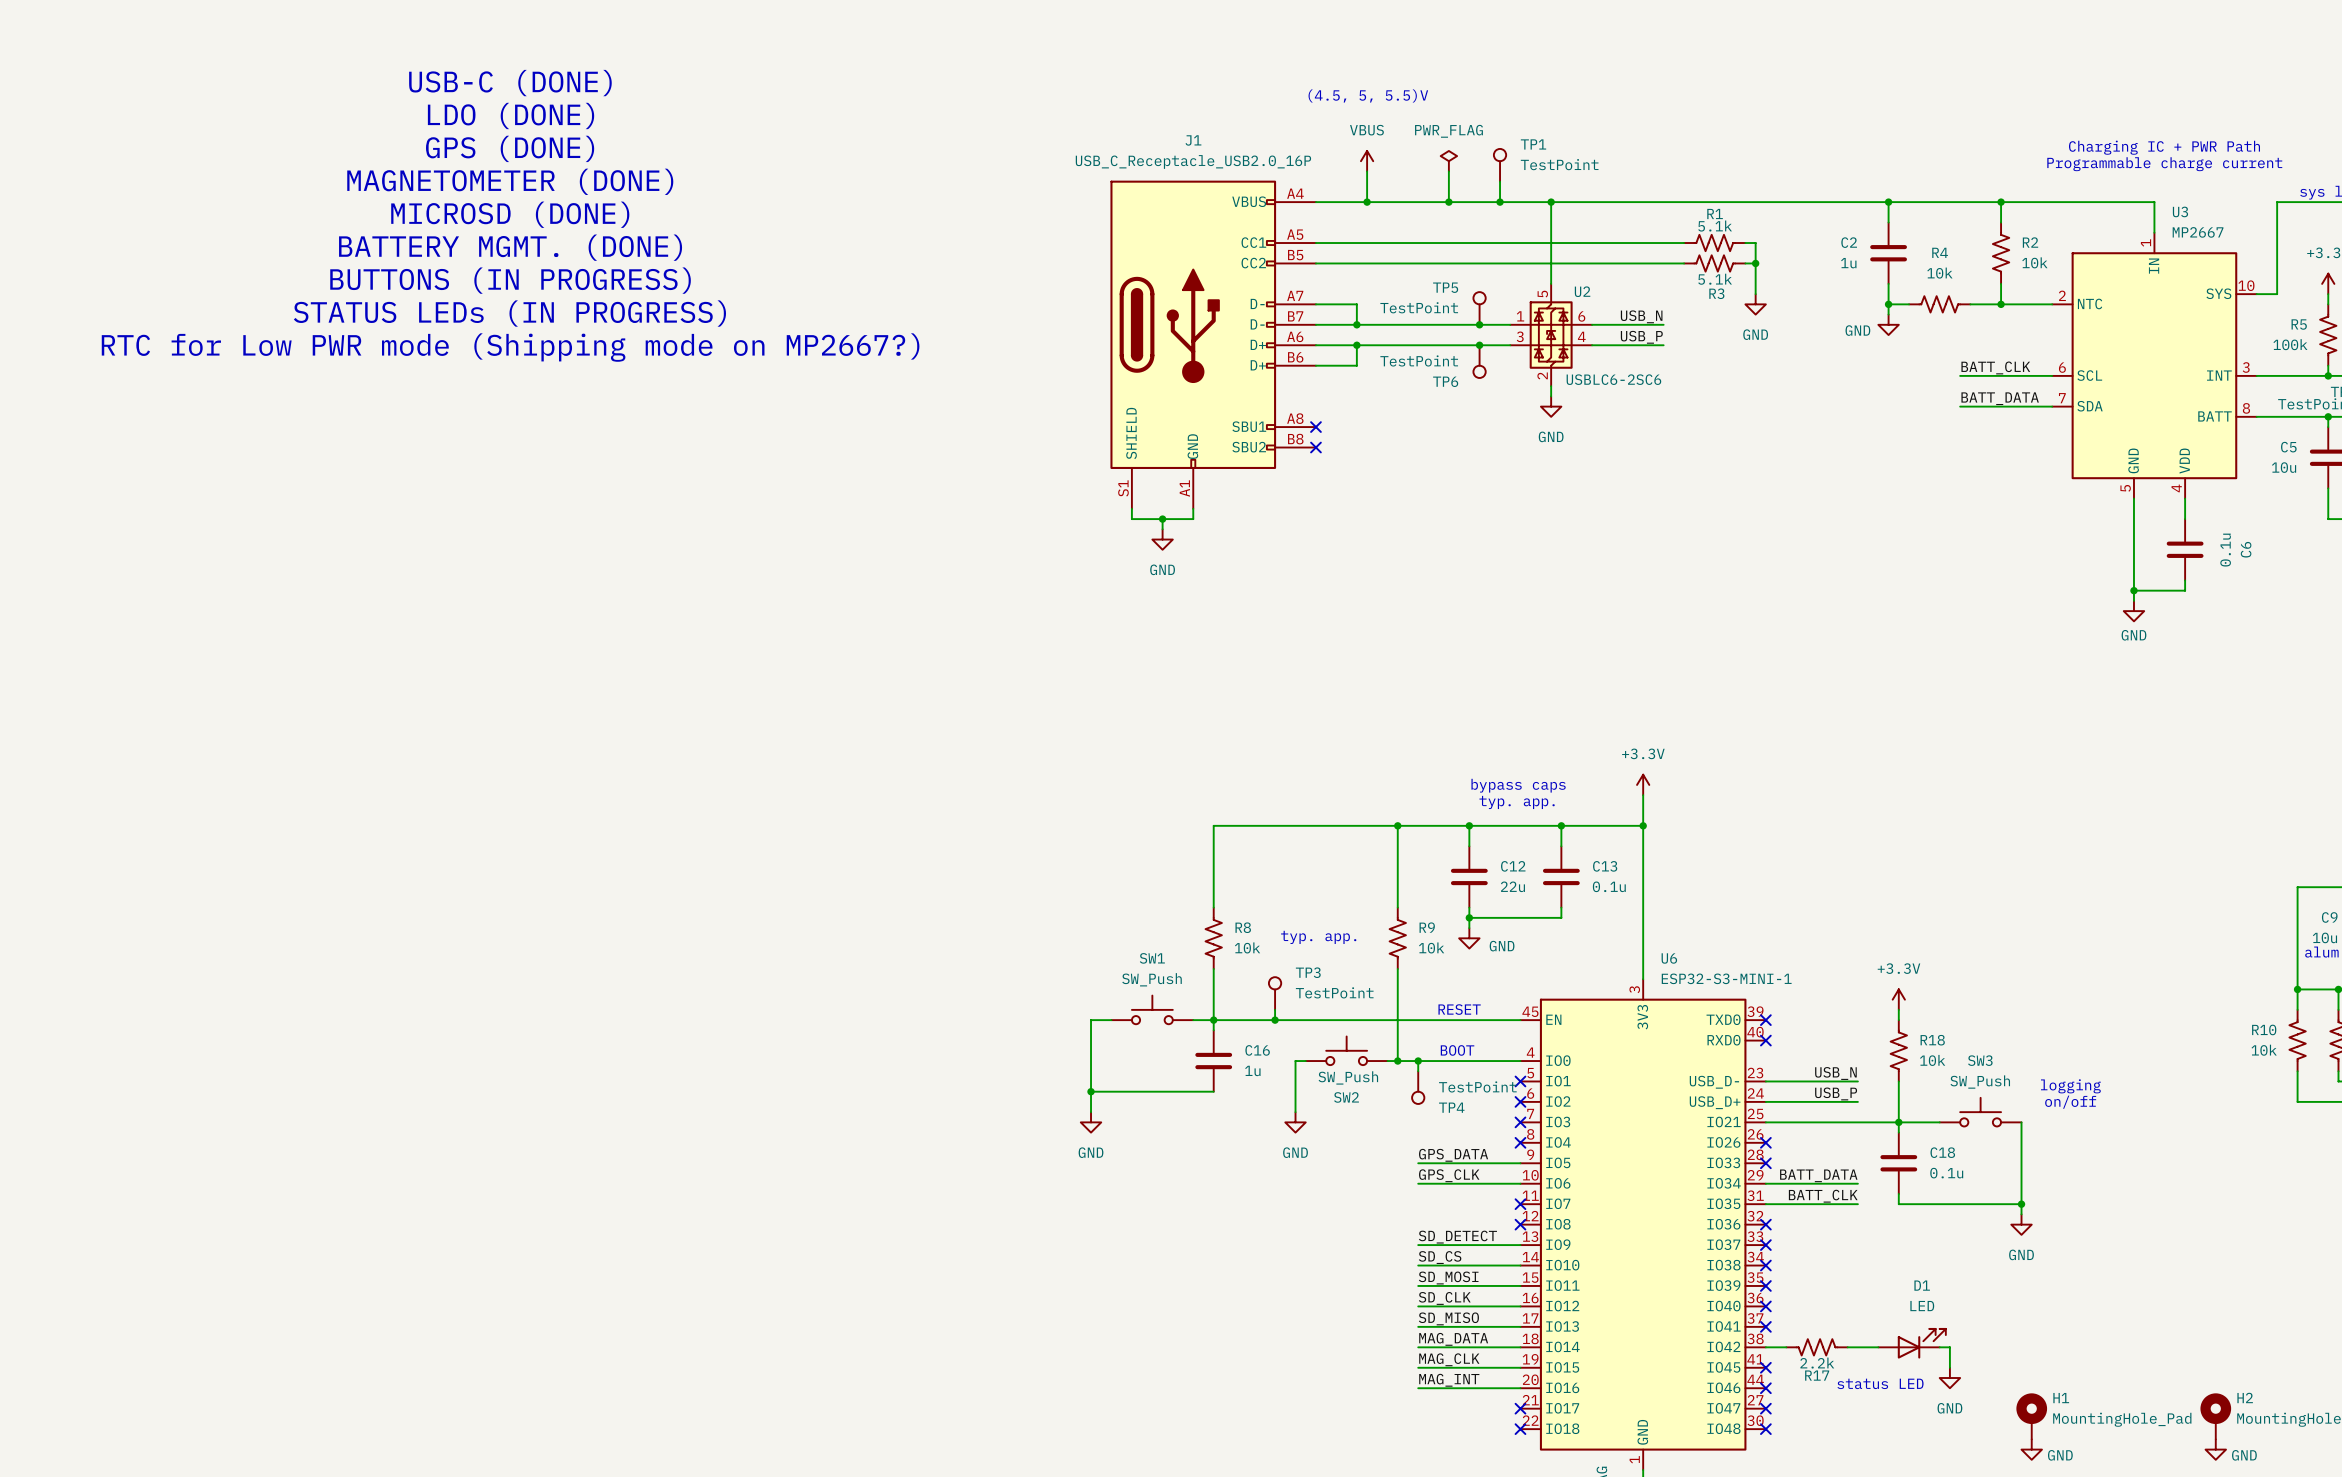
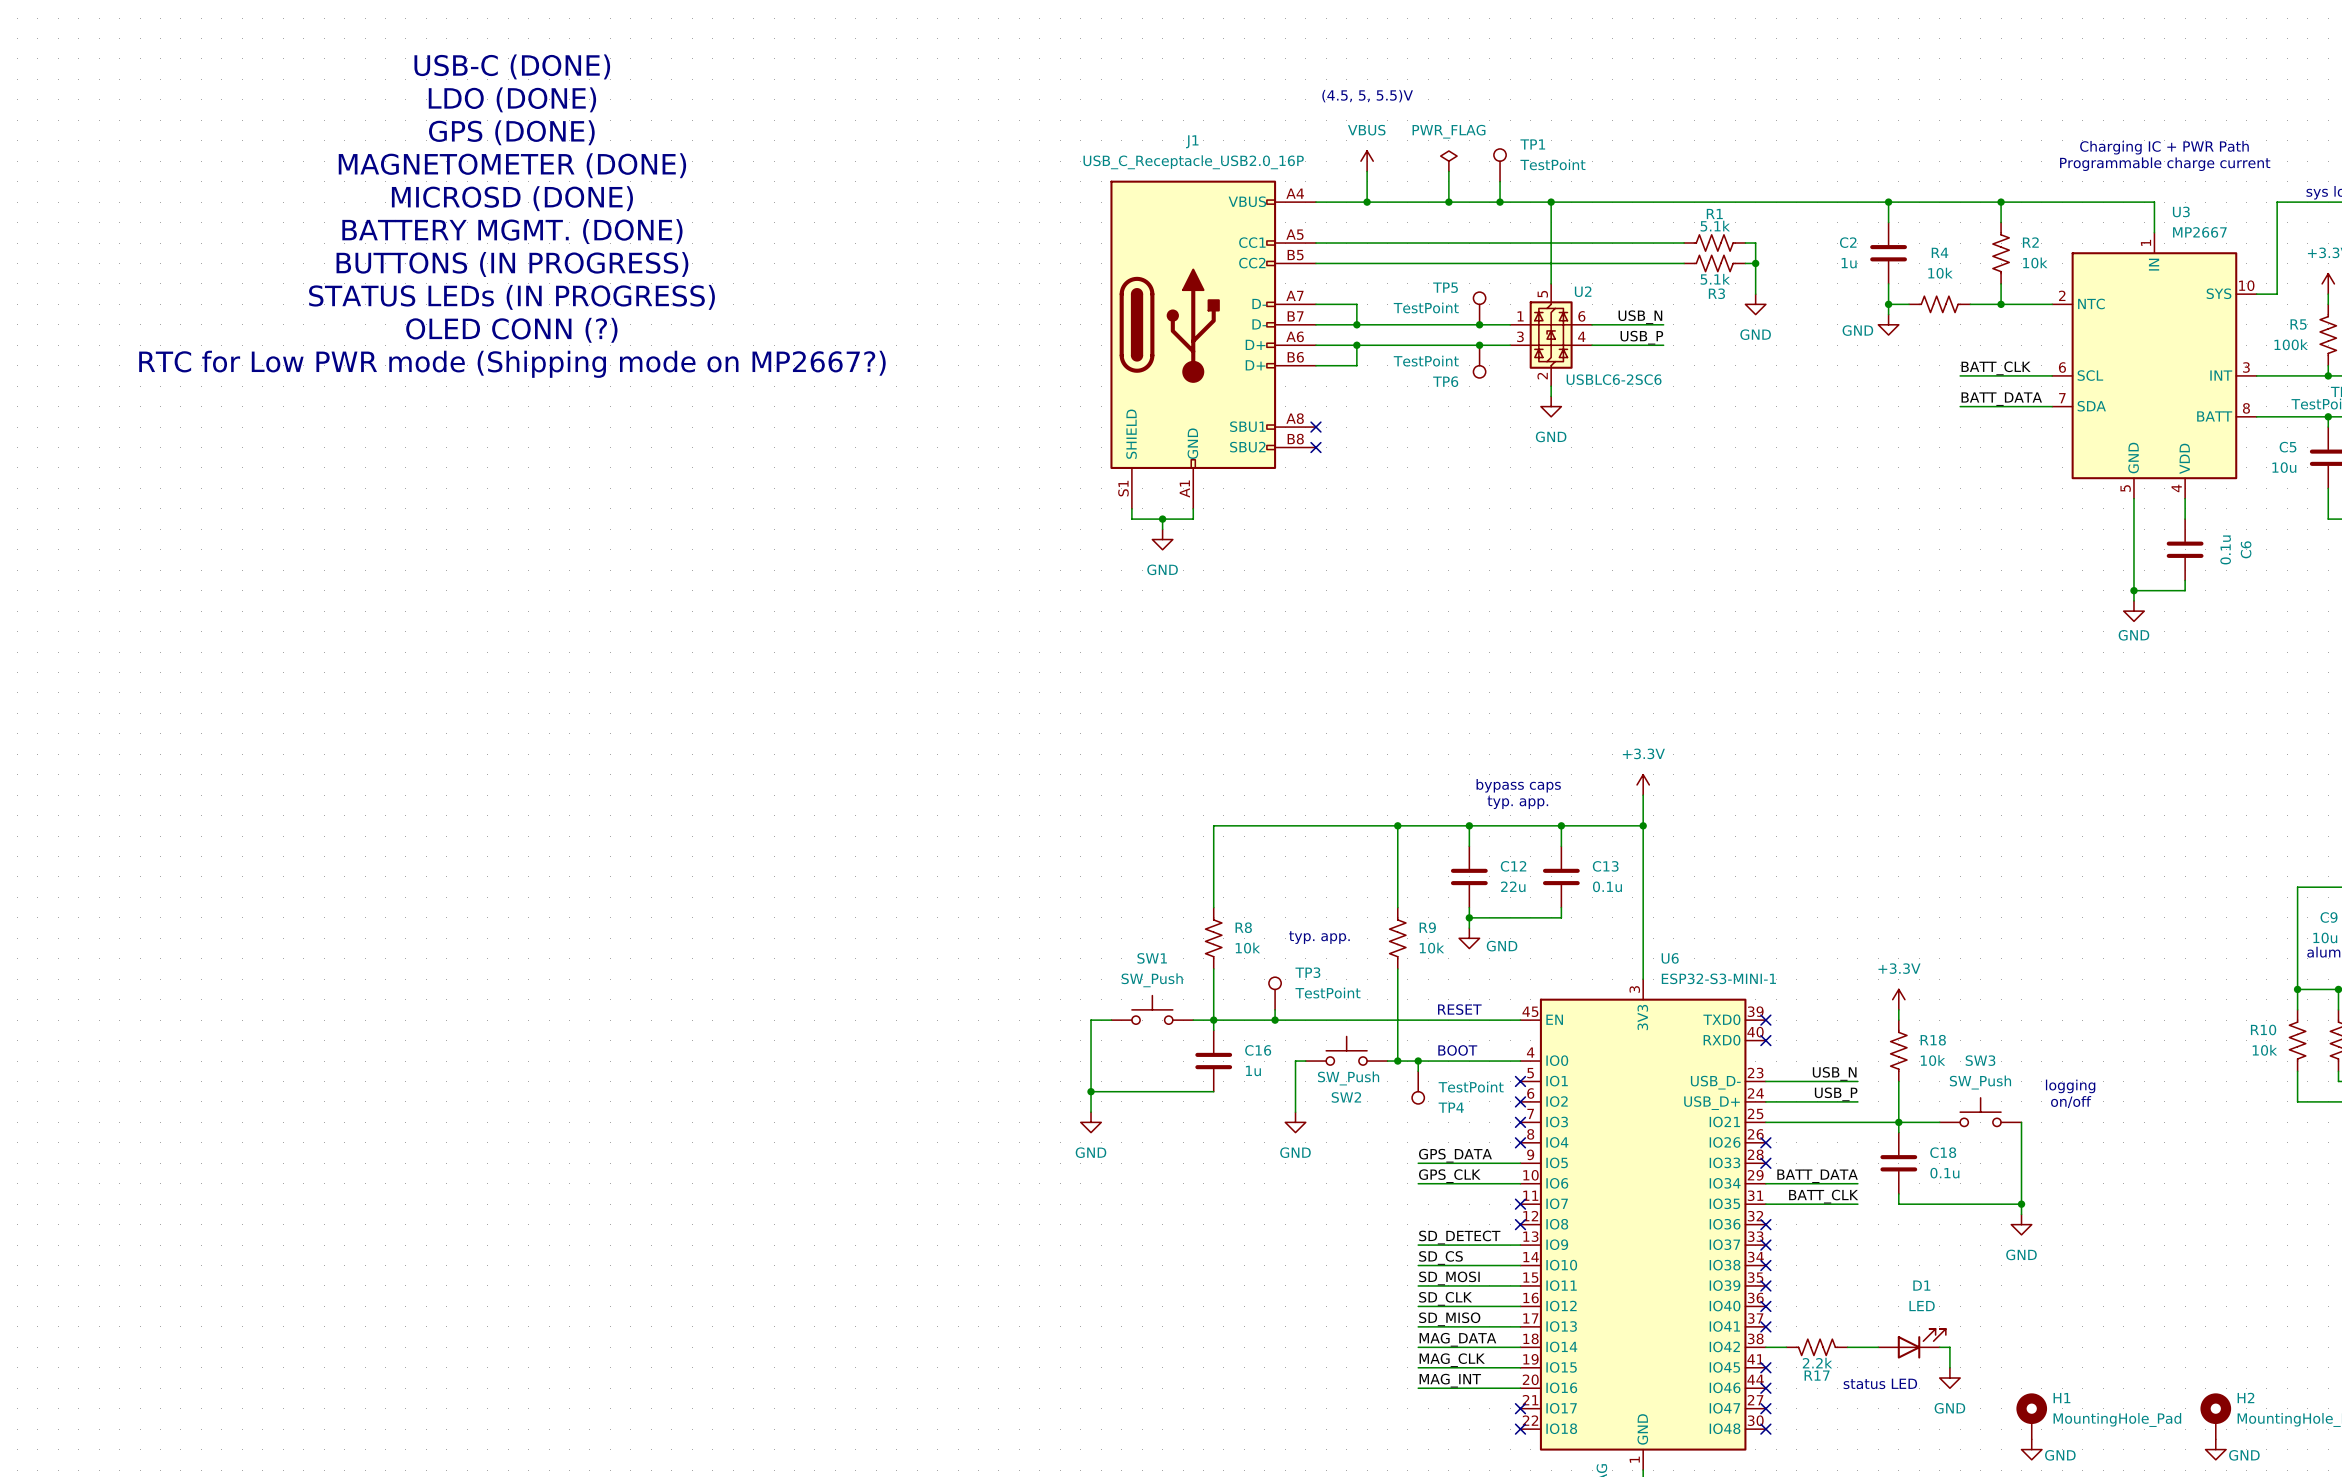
text position: USB-C (DONE) (510, 83) -> USB-C (DONE) (512, 66)
text position: LDO (DONE) (511, 115) -> LDO (DONE) (512, 99)
text position: GPS (DONE) (510, 148) -> GPS (DONE) (511, 132)
text position: MAGNETOMETER (DONE) (510, 181) -> MAGNETOMETER (DONE) (512, 165)
text position: MICROSD (DONE) (510, 214) -> MICROSD (DONE) (512, 198)
text position: BATTERY MGMT. (DONE) (510, 247) -> BATTERY MGMT. (DONE) (512, 231)
text position: BUTTONS (IN PROGRESS) (510, 280) -> BUTTONS (IN PROGRESS) (512, 264)
text position: STATUS LEDs (IN PROGRESS) (509, 313) -> STATUS LEDs (IN PROGRESS) (511, 297)
text: none -> OLED CONN (?) (511, 330)
text position: RTC for Low PWR mode (Shipping mode on MP2667?) (510, 347) -> RTC for Low PWR mode (Shipping mode on MP2667?) (512, 364)

